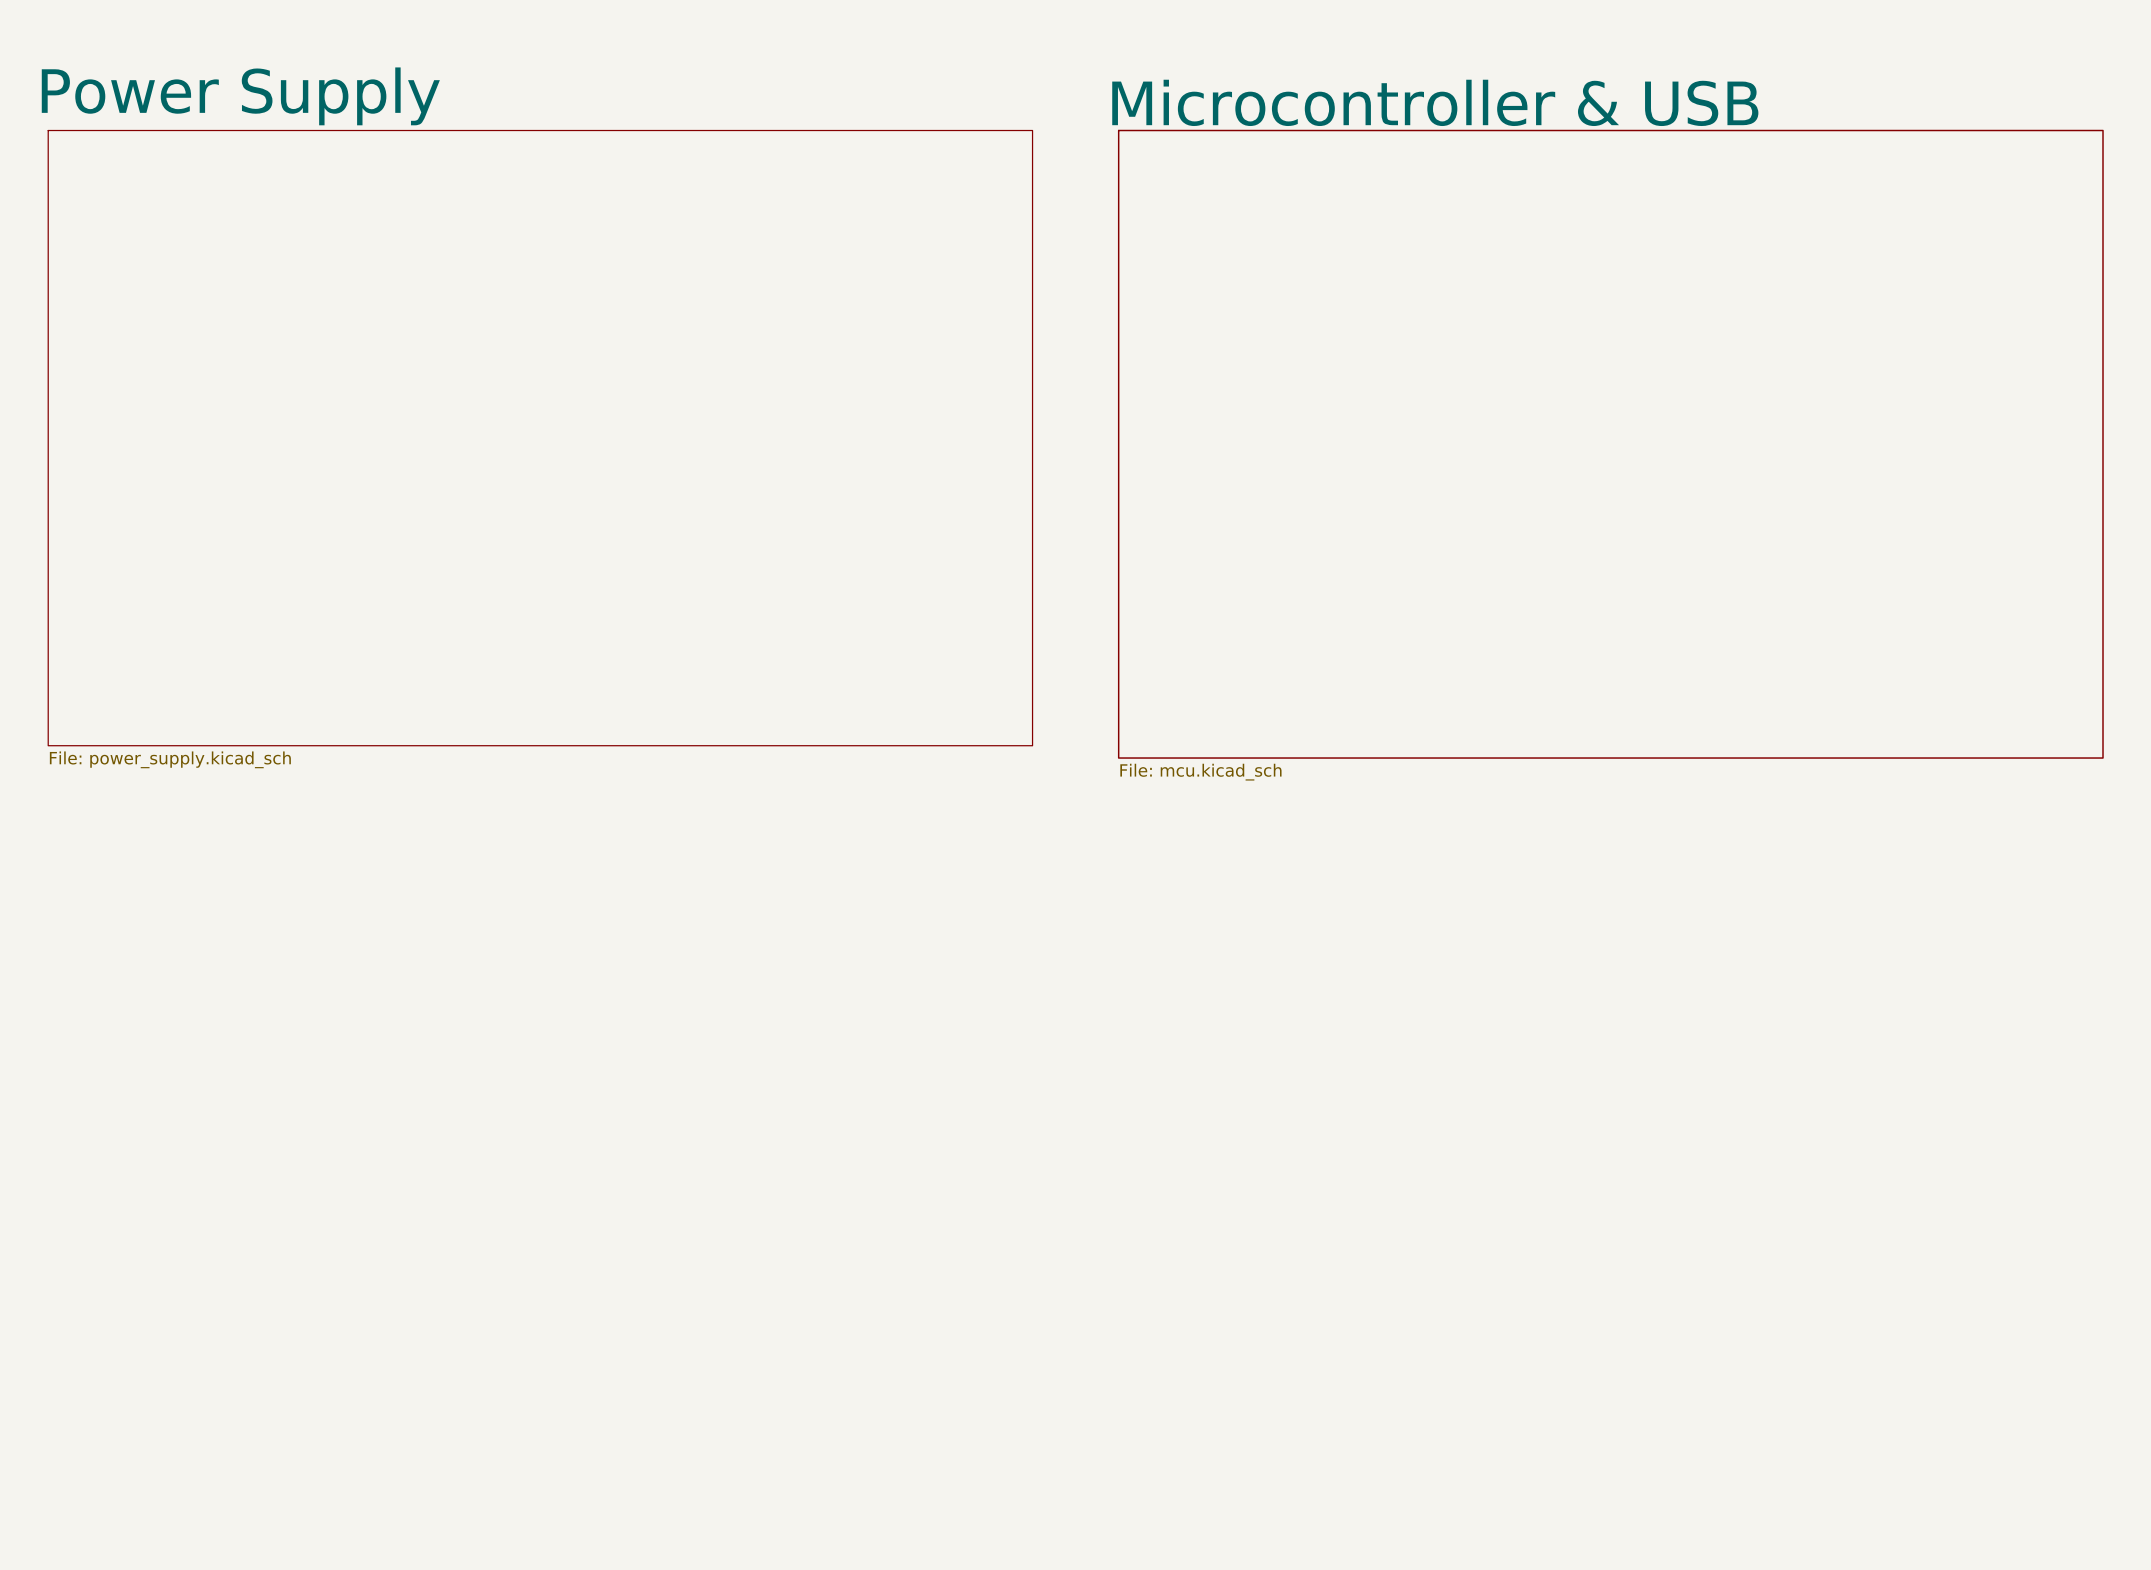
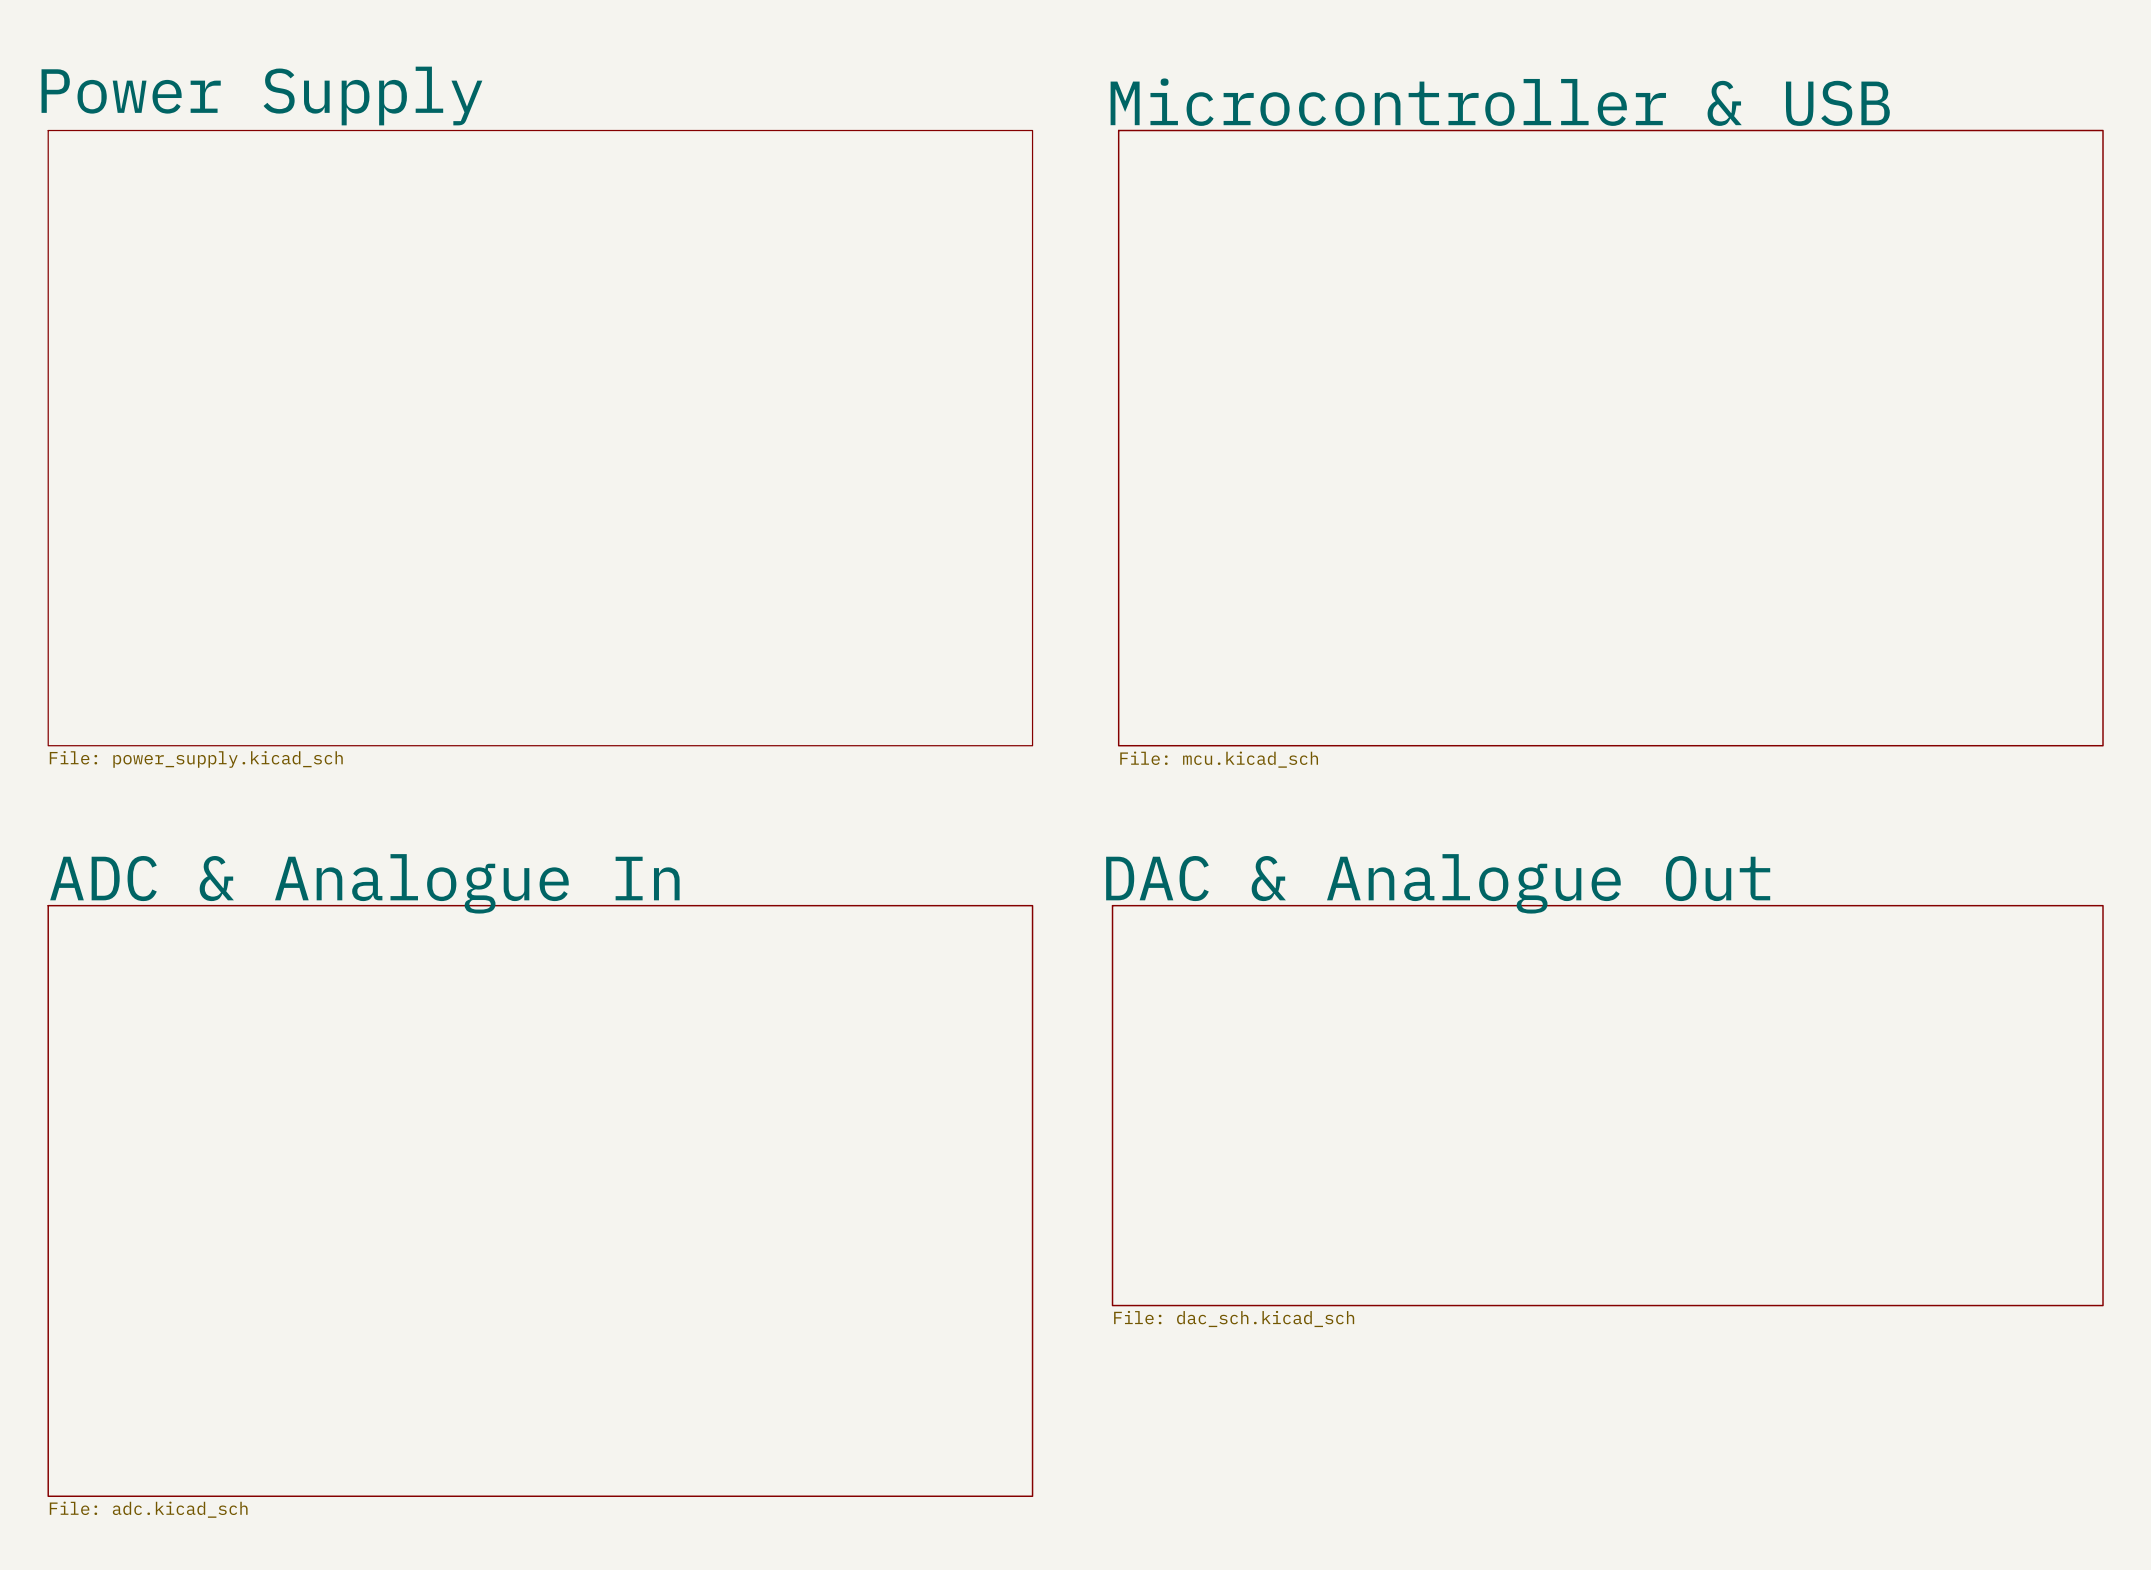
sheet Microcontroller & USB shape: [1117, 129, 2104, 759] -> [1117, 129, 2104, 747]
sheet DAC & Analogue Out: none -> File: dac_sch.kicad_sch (1607, 1105)
sheet ADC & Analogue In: none -> File: adc.kicad_sch (540, 1200)

